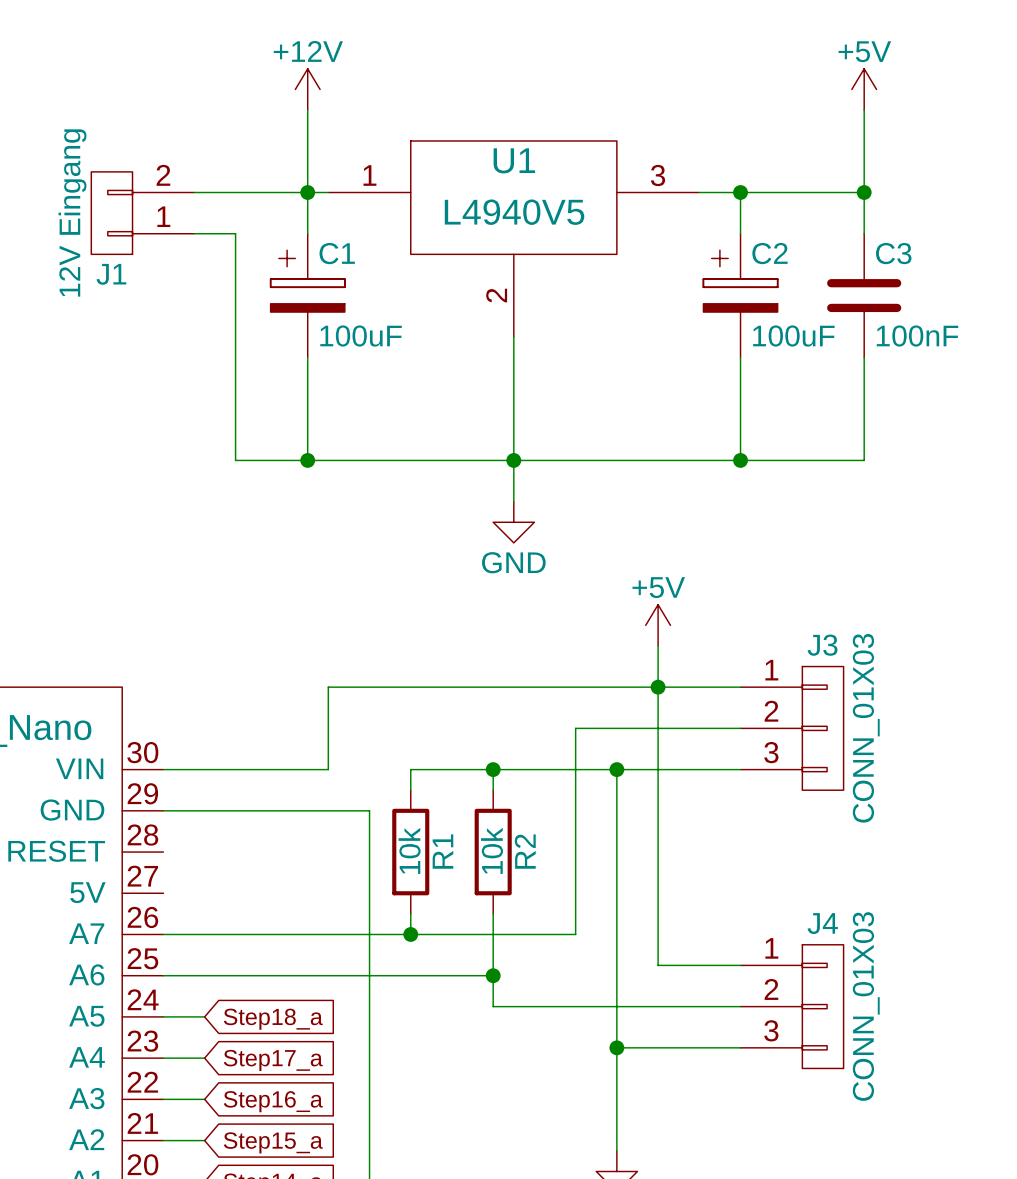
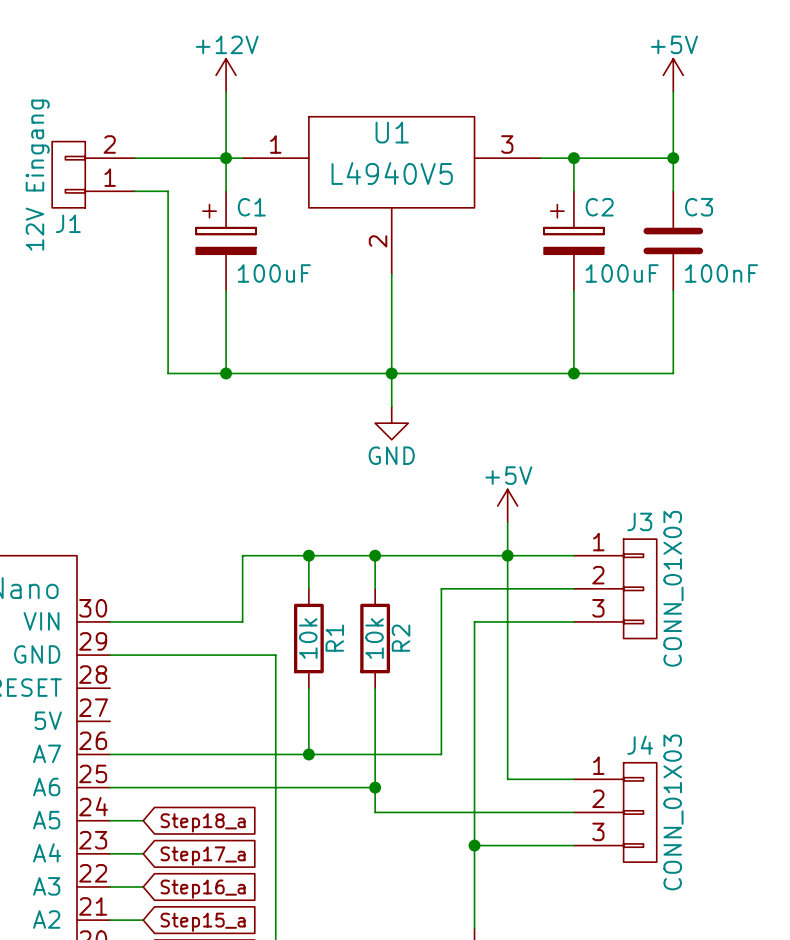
wire: none -> (308, 555) (308, 588)
junction: none -> (308, 555)
wire: none -> (375, 555) (375, 588)
junction: none -> (375, 555)
wire: (493, 769) (493, 790) -> none
junction: (493, 769) -> none
wire: (616, 769) (410, 769) (410, 790) -> none
junction: (616, 769) -> none
wire: none -> (308, 688) (308, 737)
R1 position: (410, 852) -> (308, 638)
wire: none -> (375, 688) (375, 737)
R2 position: (493, 852) -> (375, 638)

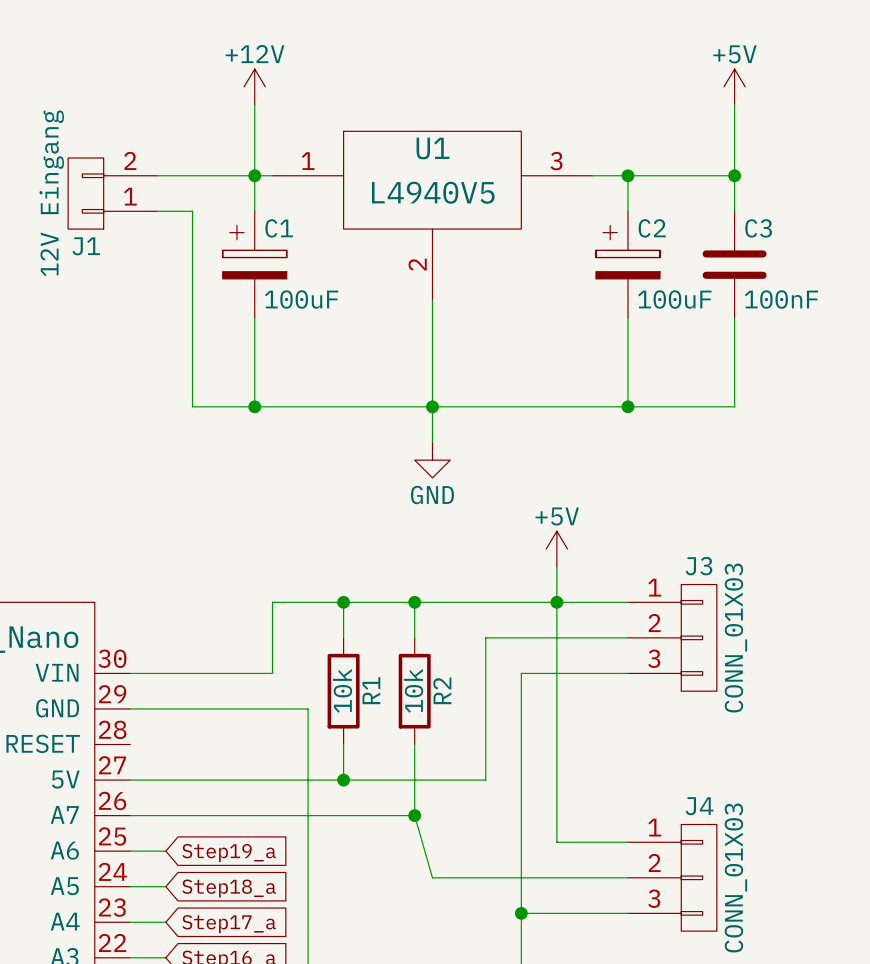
wire: none -> (130, 780) (485, 780)
wire: (308, 721) (308, 754) -> none
junction: none -> (343, 780)
wire: (441, 721) (441, 754) (375, 754) (375, 812) (391, 812) -> (414, 815) (432, 877)
junction: (308, 754) -> none
junction: none -> (414, 815)
wire: (143, 787) (375, 787) -> none
junction: (375, 787) -> none
global label: none -> Step19_a (229, 853)

